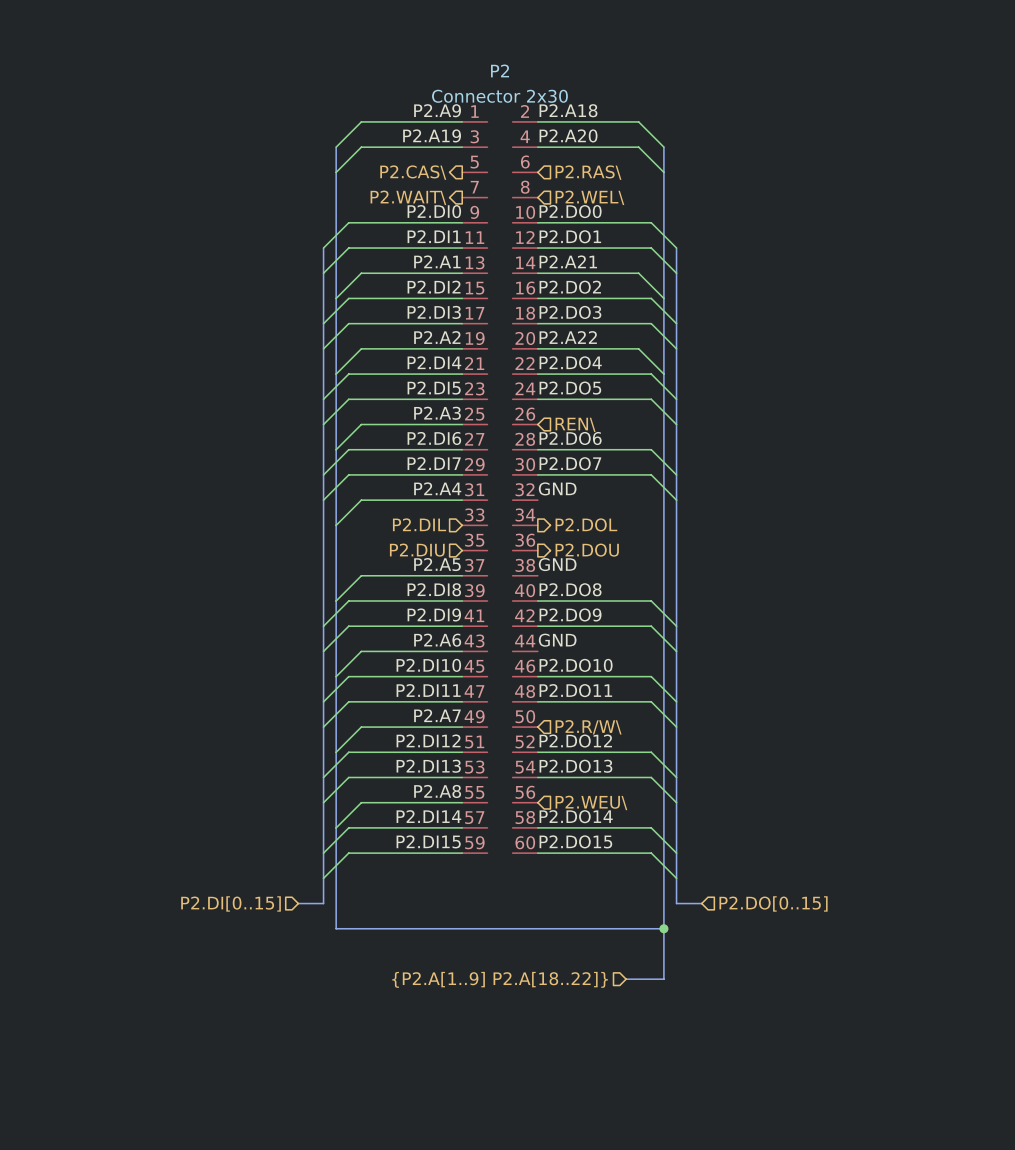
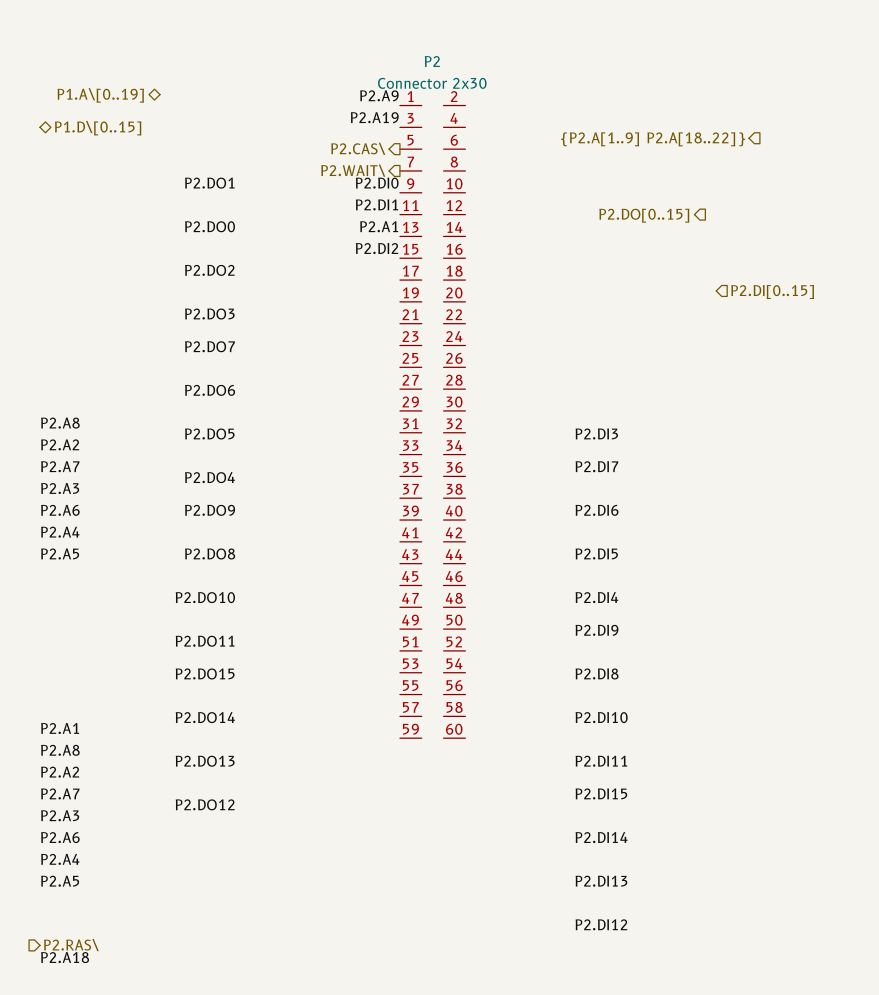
hierarchical label: none -> P1.A\[0..19] (100, 95)
label: P2.A18 (568, 110) -> none
wire: (462, 121) (361, 121) (336, 147) -> none
wire: (537, 121) (638, 121) (663, 147) -> none
label: P2.A20 (568, 135) -> none
hierarchical label: none -> P1.D\[0..15] (98, 128)
bus: (336, 147) (336, 928) (663, 928) -> none
wire: (462, 147) (361, 147) (336, 172) -> none
wire: (537, 147) (638, 147) (663, 172) -> none
bus: (663, 147) (663, 979) (626, 979) -> none
hierarchical label: none -> {P2.A[1..9] P2.A[18..22]} (653, 139)
hierarchical label: P2.RAS\ (588, 172) -> none
hierarchical label: P2.WEL\ (589, 197) -> none
label: none -> P2.DO1 (209, 183)
label: P2.DO0 (570, 211) -> none
wire: (462, 222) (348, 222) (323, 248) -> none
wire: (537, 222) (651, 222) (676, 248) -> none
label: P2.DO1 (570, 236) -> none
bus: (323, 248) (323, 903) (298, 903) -> none
wire: (462, 248) (348, 248) (323, 273) -> none
wire: (537, 248) (651, 248) (676, 273) -> none
bus: (676, 248) (676, 903) (701, 903) -> none
hierarchical label: none -> P2.DO[0..15] (644, 215)
label: none -> P2.DO0 (210, 226)
label: P2.A21 (568, 261) -> none
wire: (462, 273) (361, 273) (336, 298) -> none
wire: (537, 273) (638, 273) (663, 298) -> none
label: P2.DO2 (570, 287) -> none
wire: (462, 298) (348, 298) (323, 323) -> none
wire: (537, 298) (651, 298) (676, 323) -> none
label: none -> P2.DO2 (209, 270)
label: P2.DI3 (434, 312) -> none
label: P2.DO3 (570, 312) -> none
wire: (462, 323) (348, 323) (323, 348) -> none
wire: (537, 323) (651, 323) (676, 348) -> none
hierarchical label: none -> P2.DI[0..15] (772, 292)
label: P2.A2 (437, 337) -> none
label: P2.A22 (568, 337) -> none
wire: (462, 348) (361, 348) (336, 374) -> none
wire: (537, 348) (638, 348) (663, 374) -> none
label: none -> P2.DO3 (209, 314)
label: P2.DI4 (434, 362) -> none
label: P2.DO4 (570, 362) -> none
wire: (462, 374) (348, 374) (323, 399) -> none
wire: (537, 374) (651, 374) (676, 399) -> none
label: P2.DI5 (434, 388) -> none
label: P2.DO5 (570, 388) -> none
wire: (462, 399) (348, 399) (323, 424) -> none
wire: (537, 399) (651, 399) (676, 424) -> none
label: none -> P2.DO7 (209, 346)
label: P2.A3 (437, 413) -> none
wire: (462, 424) (361, 424) (336, 449) -> none
hierarchical label: REN\ (575, 424) -> none
label: P2.DI6 (434, 438) -> none
label: P2.DO6 (570, 438) -> none
wire: (462, 449) (348, 449) (323, 474) -> none
wire: (537, 449) (651, 449) (676, 474) -> none
label: none -> P2.DO6 (210, 390)
label position: P2.DI7 (434, 463) -> P2.DI7 (596, 466)
label: P2.DO7 (570, 463) -> none
wire: (462, 474) (348, 474) (323, 500) -> none
wire: (537, 474) (651, 474) (676, 500) -> none
label: none -> P2.A8 (60, 423)
label: P2.A4 (437, 488) -> none
label: GND (557, 488) -> none
wire: (462, 500) (361, 500) (336, 525) -> none
label: none -> P2.DO5 (209, 434)
label: none -> P2.DI3 (596, 433)
label: none -> P2.A2 (60, 444)
hierarchical label: P2.DIL (419, 524) -> none
hierarchical label: P2.DOL (586, 524) -> none
label: none -> P2.A7 (60, 466)
hierarchical label: P2.DIU (417, 550) -> none
hierarchical label: P2.DOU (587, 550) -> none
label: none -> P2.DO4 (209, 477)
label: none -> P2.A3 (60, 488)
label: P2.A5 (437, 564) -> none
label: GND (557, 564) -> none
wire: (462, 575) (361, 575) (336, 601) -> none
label: none -> P2.A6 (60, 510)
label: none -> P2.DO9 (210, 510)
label: P2.DI8 (434, 589) -> none
label: P2.DO8 (570, 589) -> none
label: none -> P2.DI6 (597, 510)
wire: (462, 601) (348, 601) (323, 626) -> none
wire: (537, 601) (651, 601) (676, 626) -> none
label: none -> P2.A4 (60, 532)
label position: P2.DI9 (434, 614) -> P2.DI9 (596, 630)
label: P2.DO9 (570, 614) -> none
wire: (462, 626) (348, 626) (323, 651) -> none
wire: (537, 626) (651, 626) (676, 651) -> none
label: none -> P2.A5 (60, 553)
label: none -> P2.DO8 (210, 553)
label: P2.A6 (437, 640) -> none
label: GND (557, 640) -> none
label: none -> P2.DI5 (596, 553)
wire: (462, 651) (361, 651) (336, 676) -> none
label: P2.DI10 (428, 665) -> none
label: P2.DO10 (576, 665) -> none
wire: (462, 676) (348, 676) (323, 701) -> none
wire: (537, 676) (651, 676) (676, 701) -> none
label: none -> P2.DO10 (205, 597)
label: P2.DI11 (428, 690) -> none
label: P2.DO11 (575, 690) -> none
label: none -> P2.DI4 (596, 597)
wire: (462, 701) (348, 701) (323, 727) -> none
wire: (537, 701) (651, 701) (676, 727) -> none
label: P2.A7 (437, 715) -> none
wire: (462, 727) (361, 727) (336, 752) -> none
hierarchical label: P2.R/W\ (588, 727) -> none
label: P2.DI12 (428, 740) -> none
label: none -> P2.DO11 (205, 641)
label: P2.DO12 (575, 741) -> none
wire: (462, 752) (348, 752) (323, 777) -> none
wire: (537, 752) (651, 752) (676, 777) -> none
label: P2.DI13 (428, 766) -> none
label: P2.DO13 (575, 766) -> none
wire: (462, 777) (348, 777) (323, 802) -> none
wire: (537, 777) (651, 777) (676, 802) -> none
label: none -> P2.DO15 (205, 673)
label: none -> P2.DI8 (597, 673)
label: P2.A8 (437, 791) -> none
wire: (462, 802) (361, 802) (336, 827) -> none
hierarchical label: P2.WEU\ (591, 802) -> none
label: P2.DI14 (428, 816) -> none
label: P2.DO14 (576, 816) -> none
wire: (462, 827) (348, 827) (323, 853) -> none
wire: (537, 827) (651, 827) (676, 853) -> none
label: none -> P2.DO14 (205, 717)
label: none -> P2.DI10 (601, 717)
label: none -> P2.A1 (60, 728)
label position: P2.DI15 (428, 841) -> P2.DI15 (601, 793)
label: P2.DO15 (575, 841) -> none
wire: (462, 853) (348, 853) (323, 878) -> none
wire: (537, 853) (651, 853) (676, 878) -> none
label: none -> P2.A8 (60, 750)
label: none -> P2.DO13 (205, 761)
label: none -> P2.DI11 (601, 761)
label: none -> P2.A2 (60, 772)
hierarchical label: P2.DI[0..15] (231, 903) -> none
hierarchical label: P2.DO[0..15] (773, 903) -> none
label: none -> P2.A7 (60, 793)
junction: (663, 928) -> none
label: none -> P2.DO12 (205, 804)
label: none -> P2.A3 (60, 815)
label: none -> P2.A6 (60, 837)
label: none -> P2.DI14 (601, 837)
hierarchical label: {P2.A[1..9] P2.A[18..22]} (500, 979) -> none
label: none -> P2.A4 (60, 859)
label: none -> P2.A5 (60, 881)
label: none -> P2.DI13 (601, 881)
label: none -> P2.DI12 (601, 924)
hierarchical label: none -> P2.RAS\ (71, 945)
label: none -> P2.A18 (65, 957)

